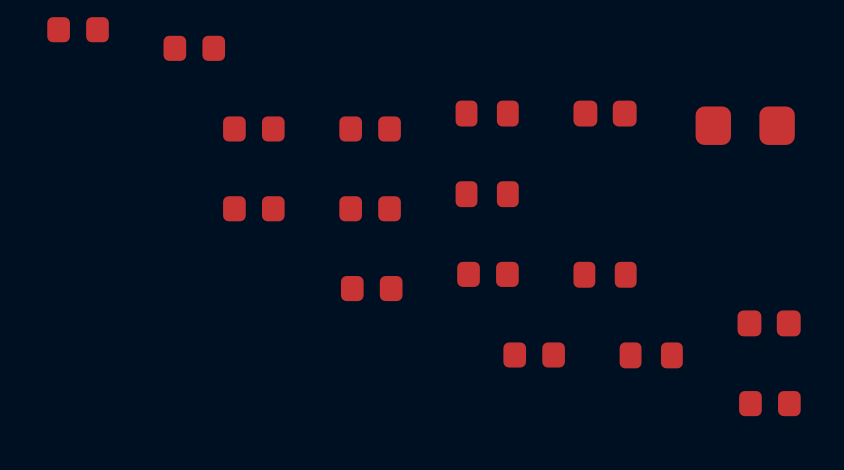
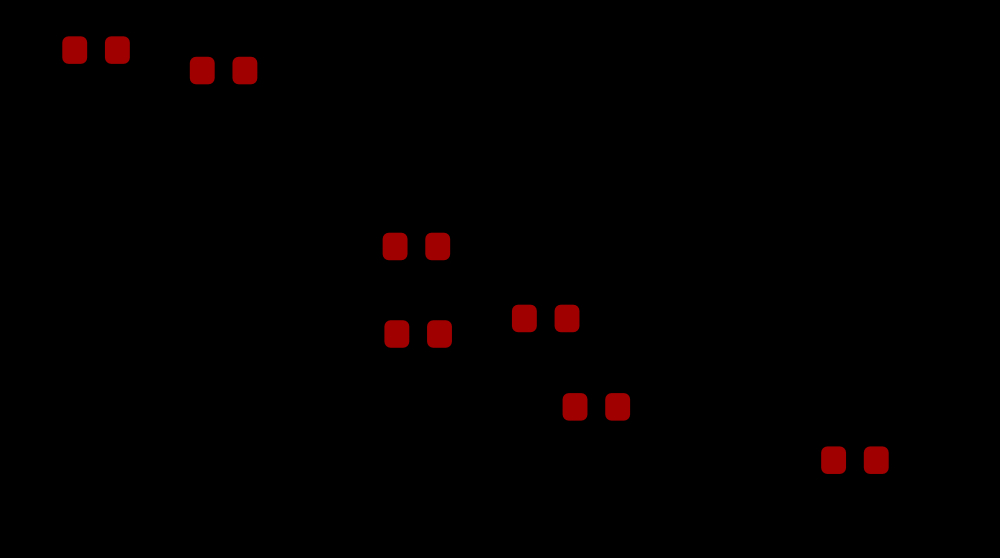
part: (487, 113) -> none
part: (605, 113) -> none
part: (745, 125) -> none
part: (253, 128) -> none
part: (370, 128) -> none
part: (487, 194) -> none
part: (253, 208) -> none
part: (605, 274) -> none
part: (769, 323) -> none
part: (651, 355) -> none

